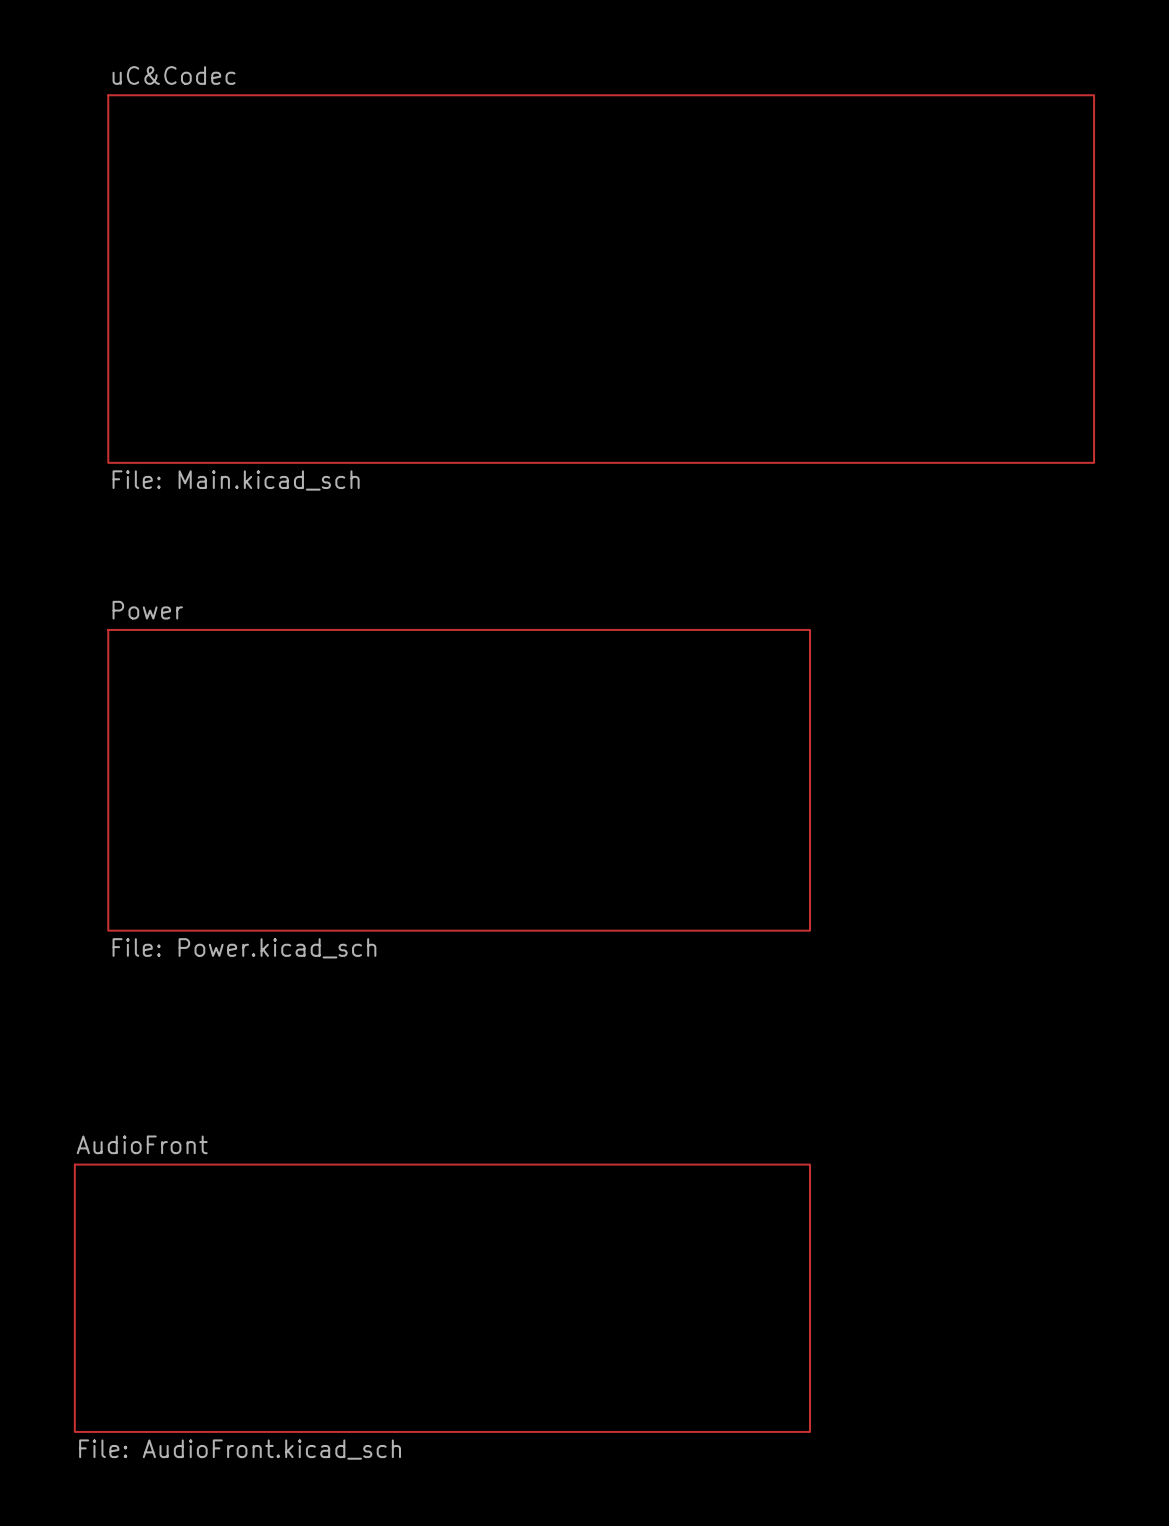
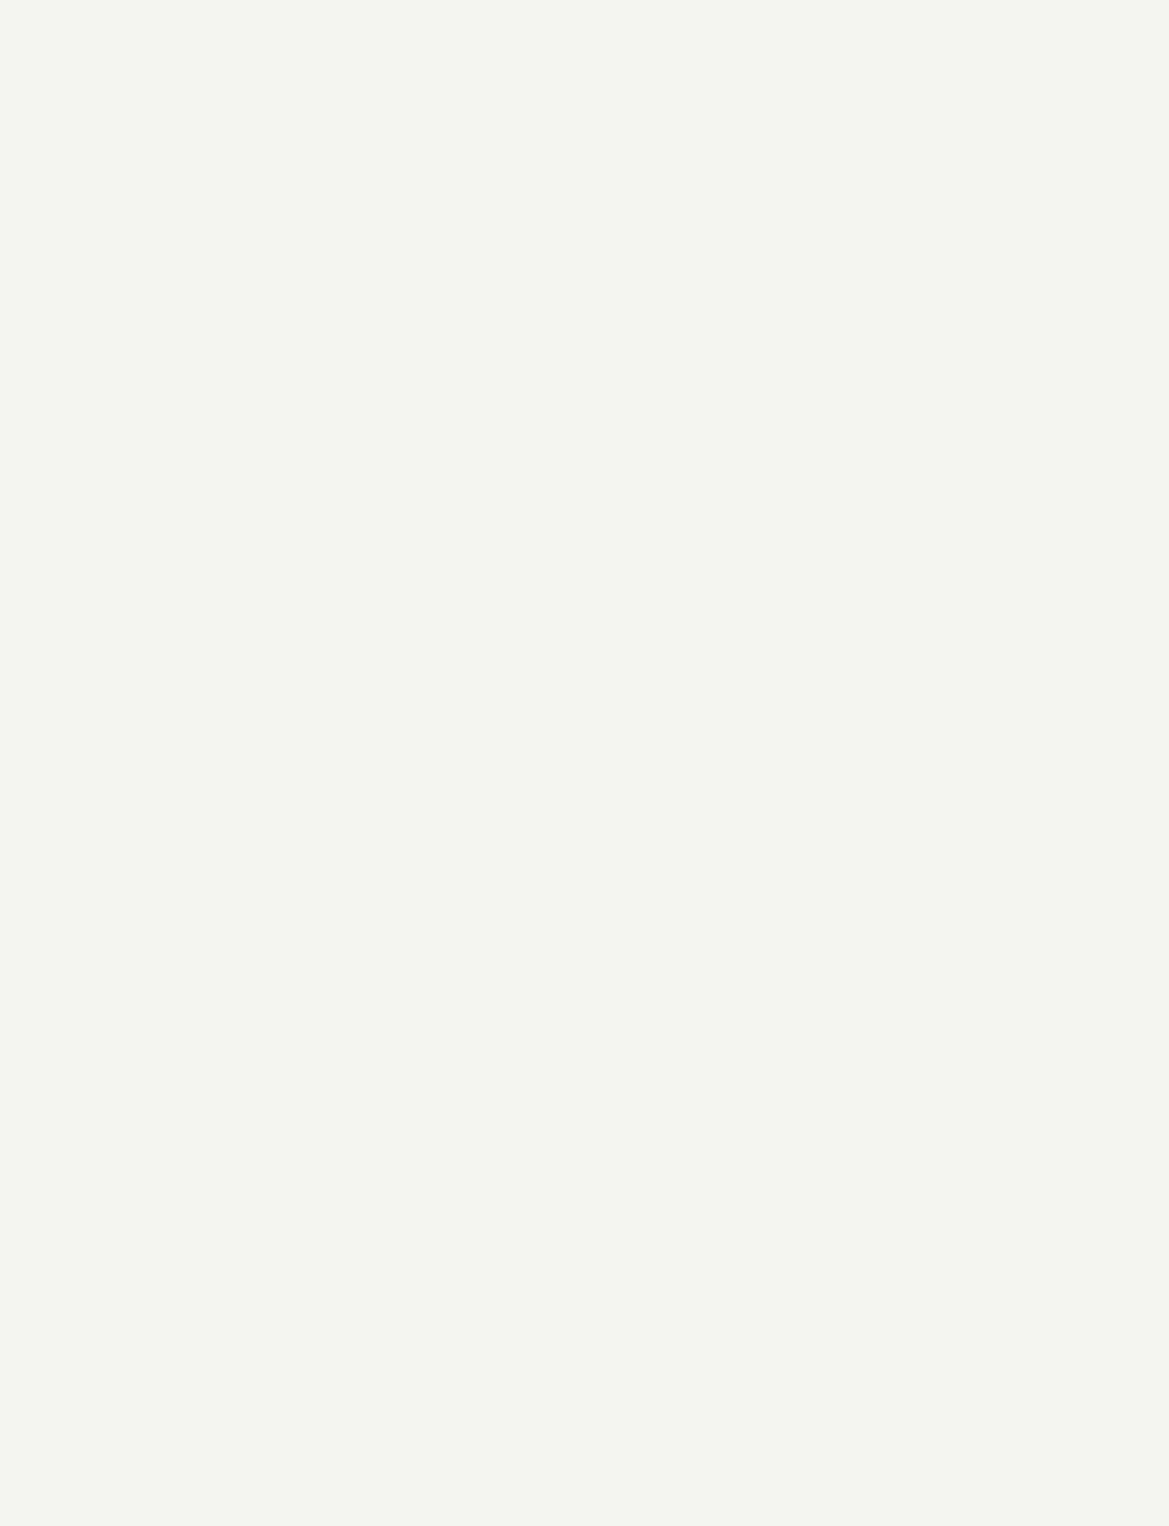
sheet uC&Codec: File: Main.kicad_sch (601, 279) -> none
sheet Power: File: Power.kicad_sch (459, 780) -> none
sheet AudioFront: File: AudioFront.kicad_sch (442, 1298) -> none

